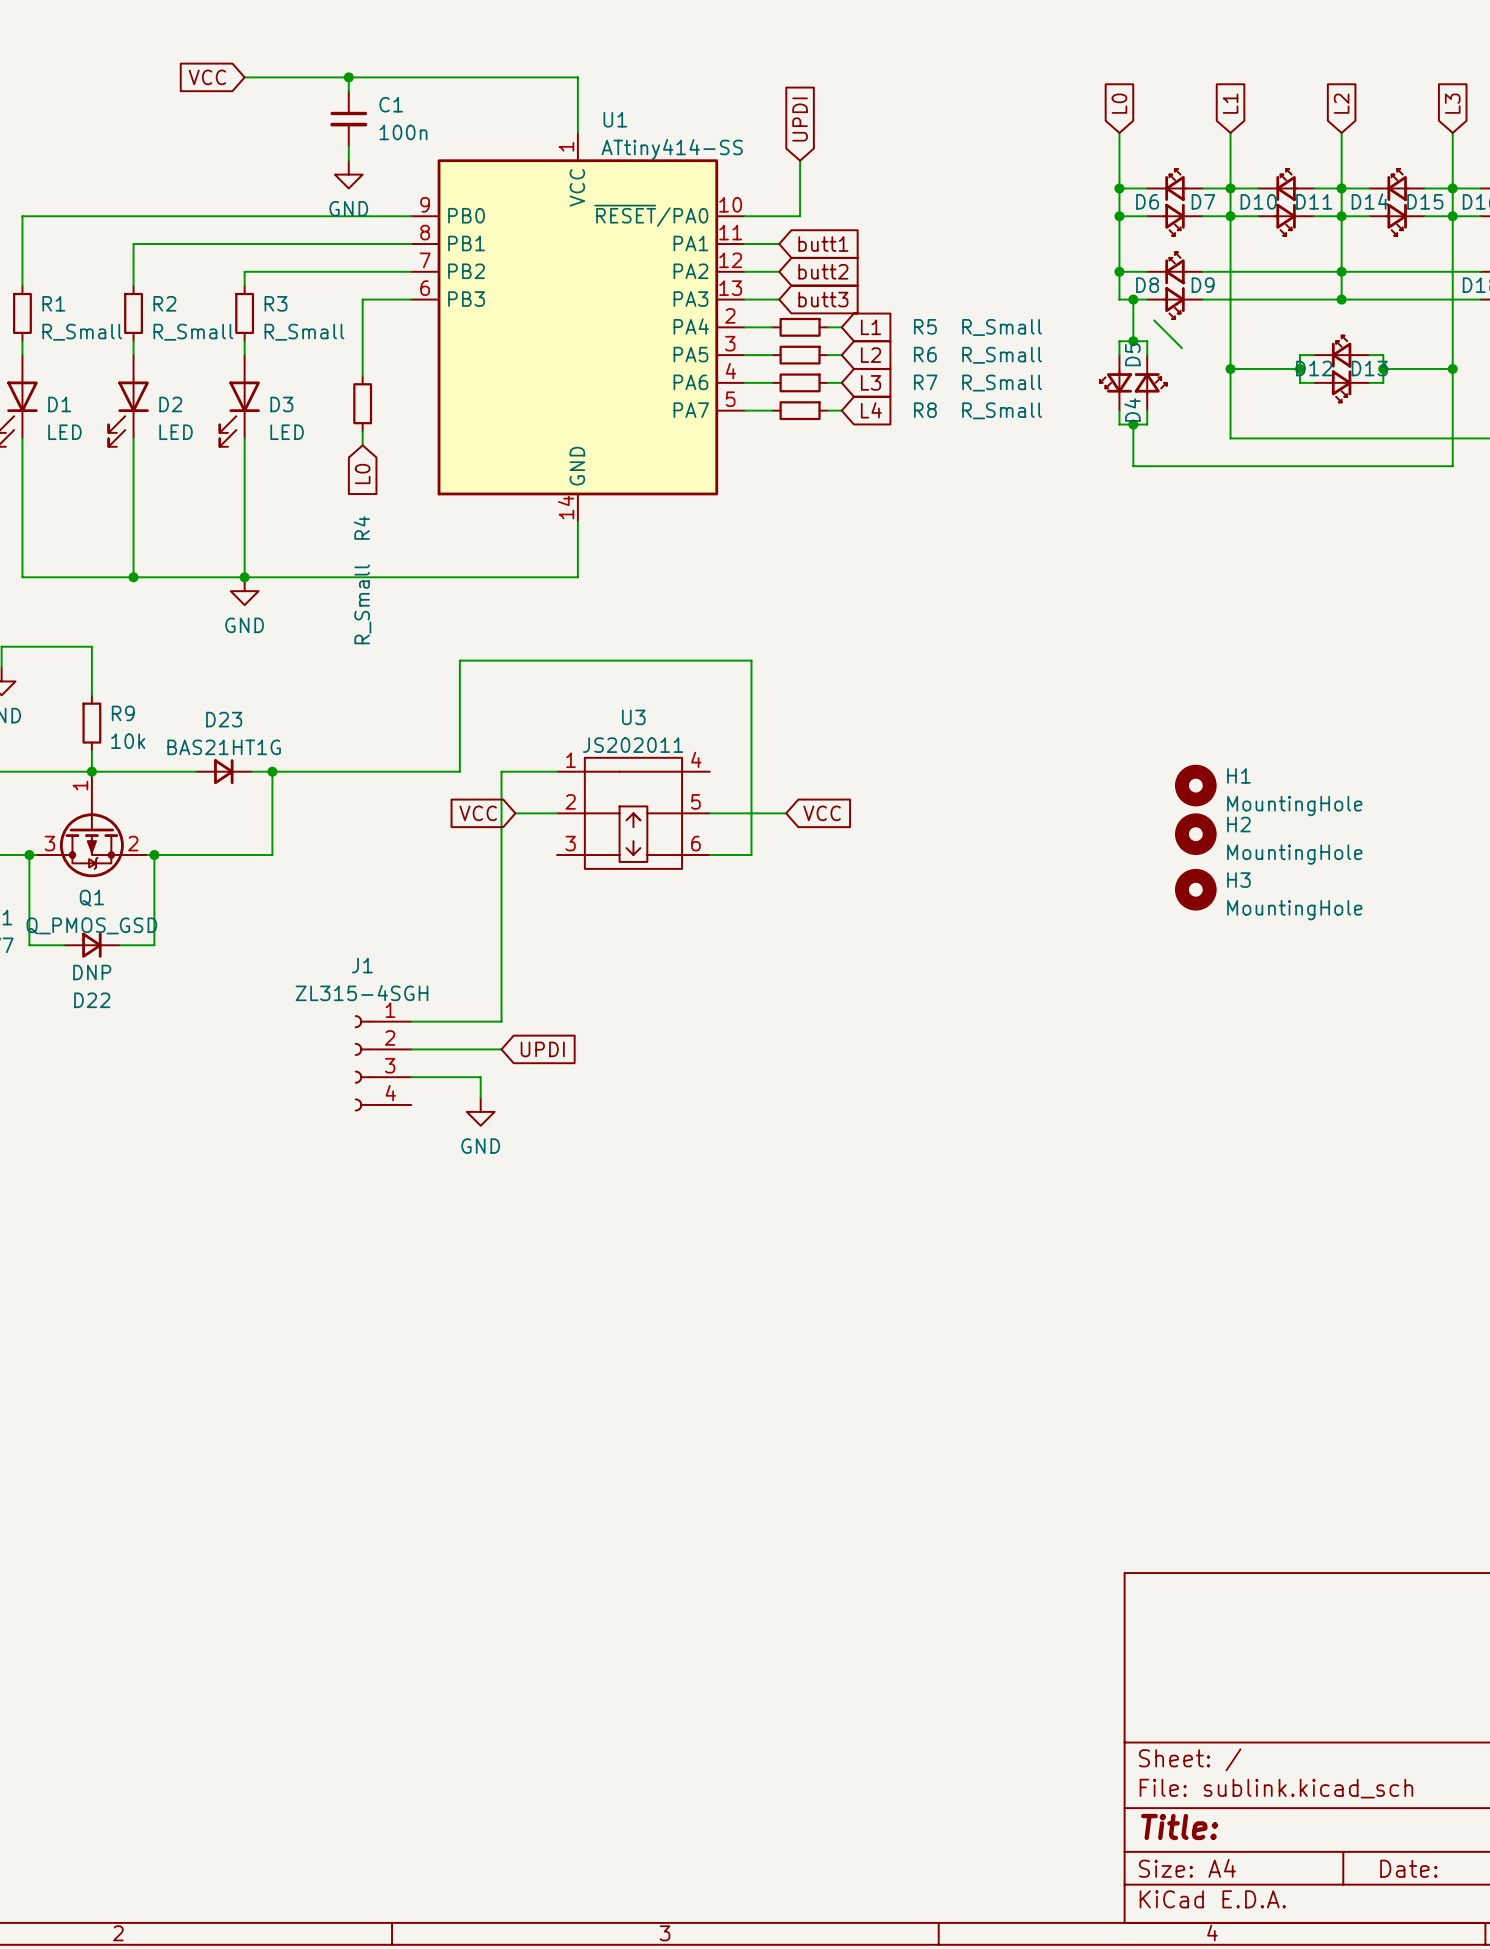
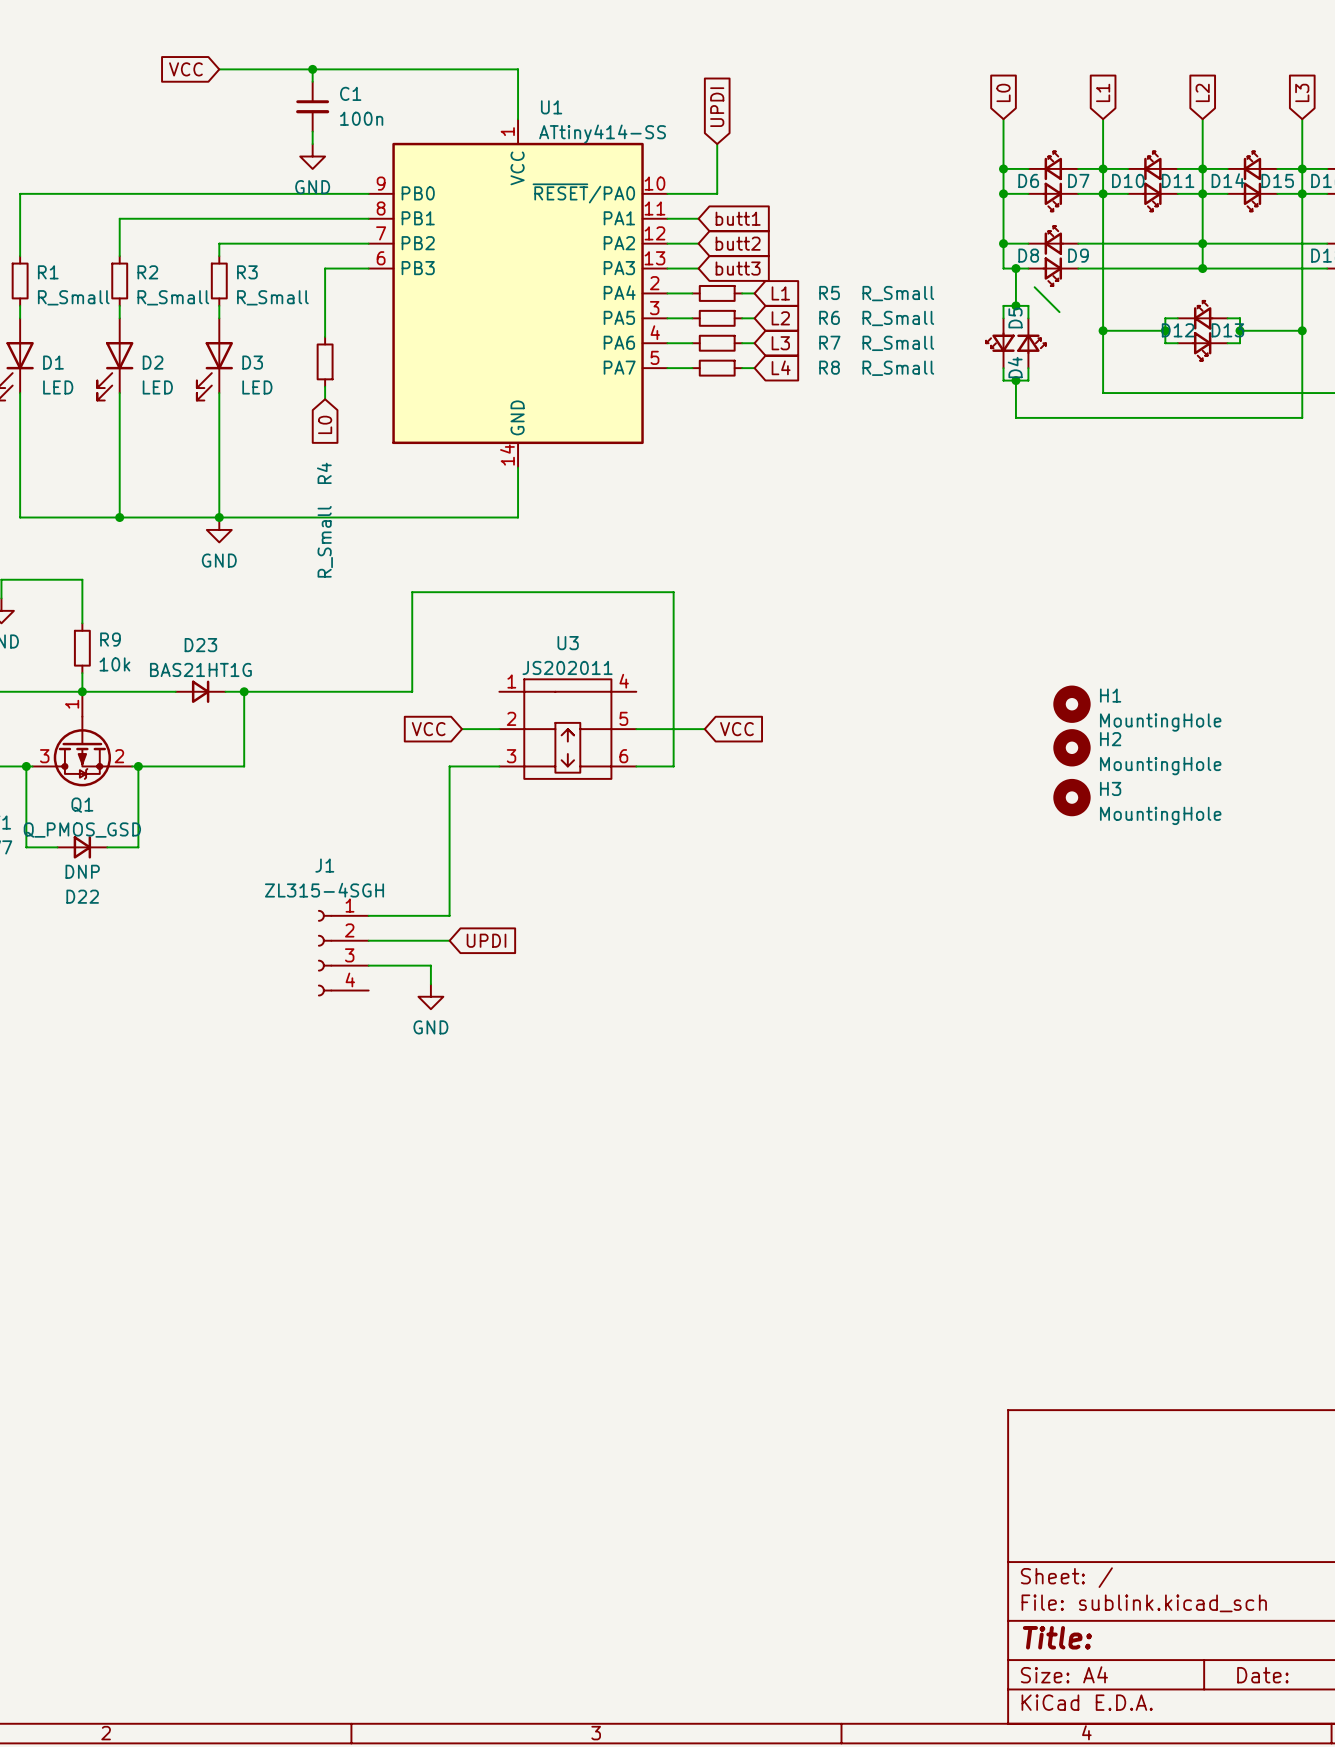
wire: (557, 771) (501, 771) (501, 855) -> (499, 766) (449, 766)

